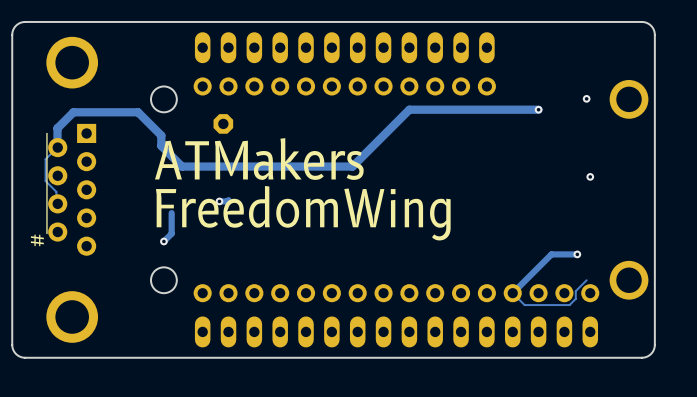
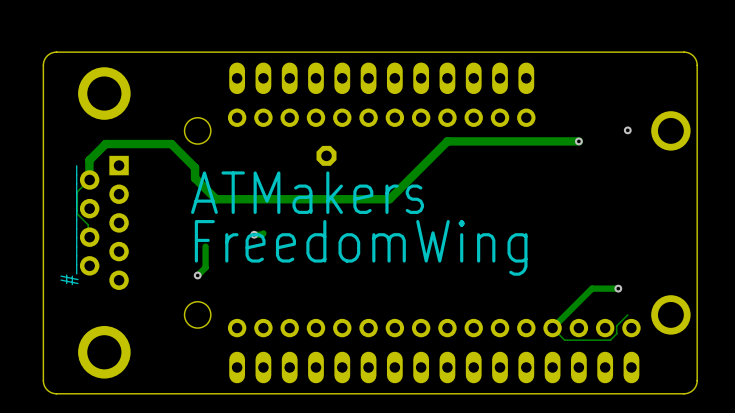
part position: (223, 123) -> (326, 155)
via: (590, 176) -> none

